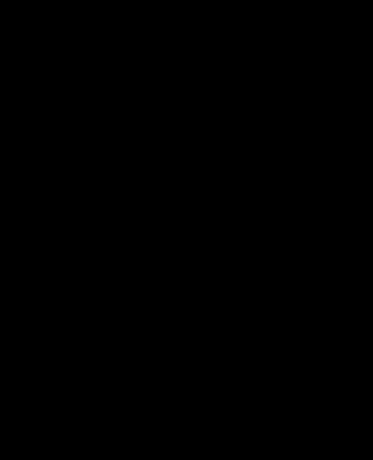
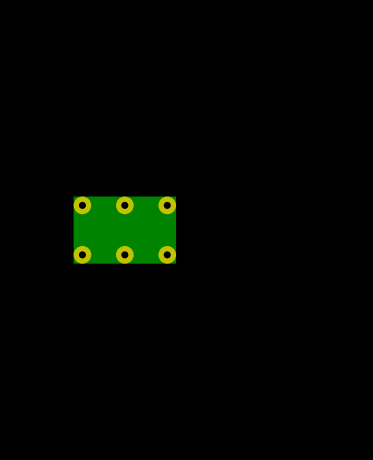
part: none -> (124, 230)

